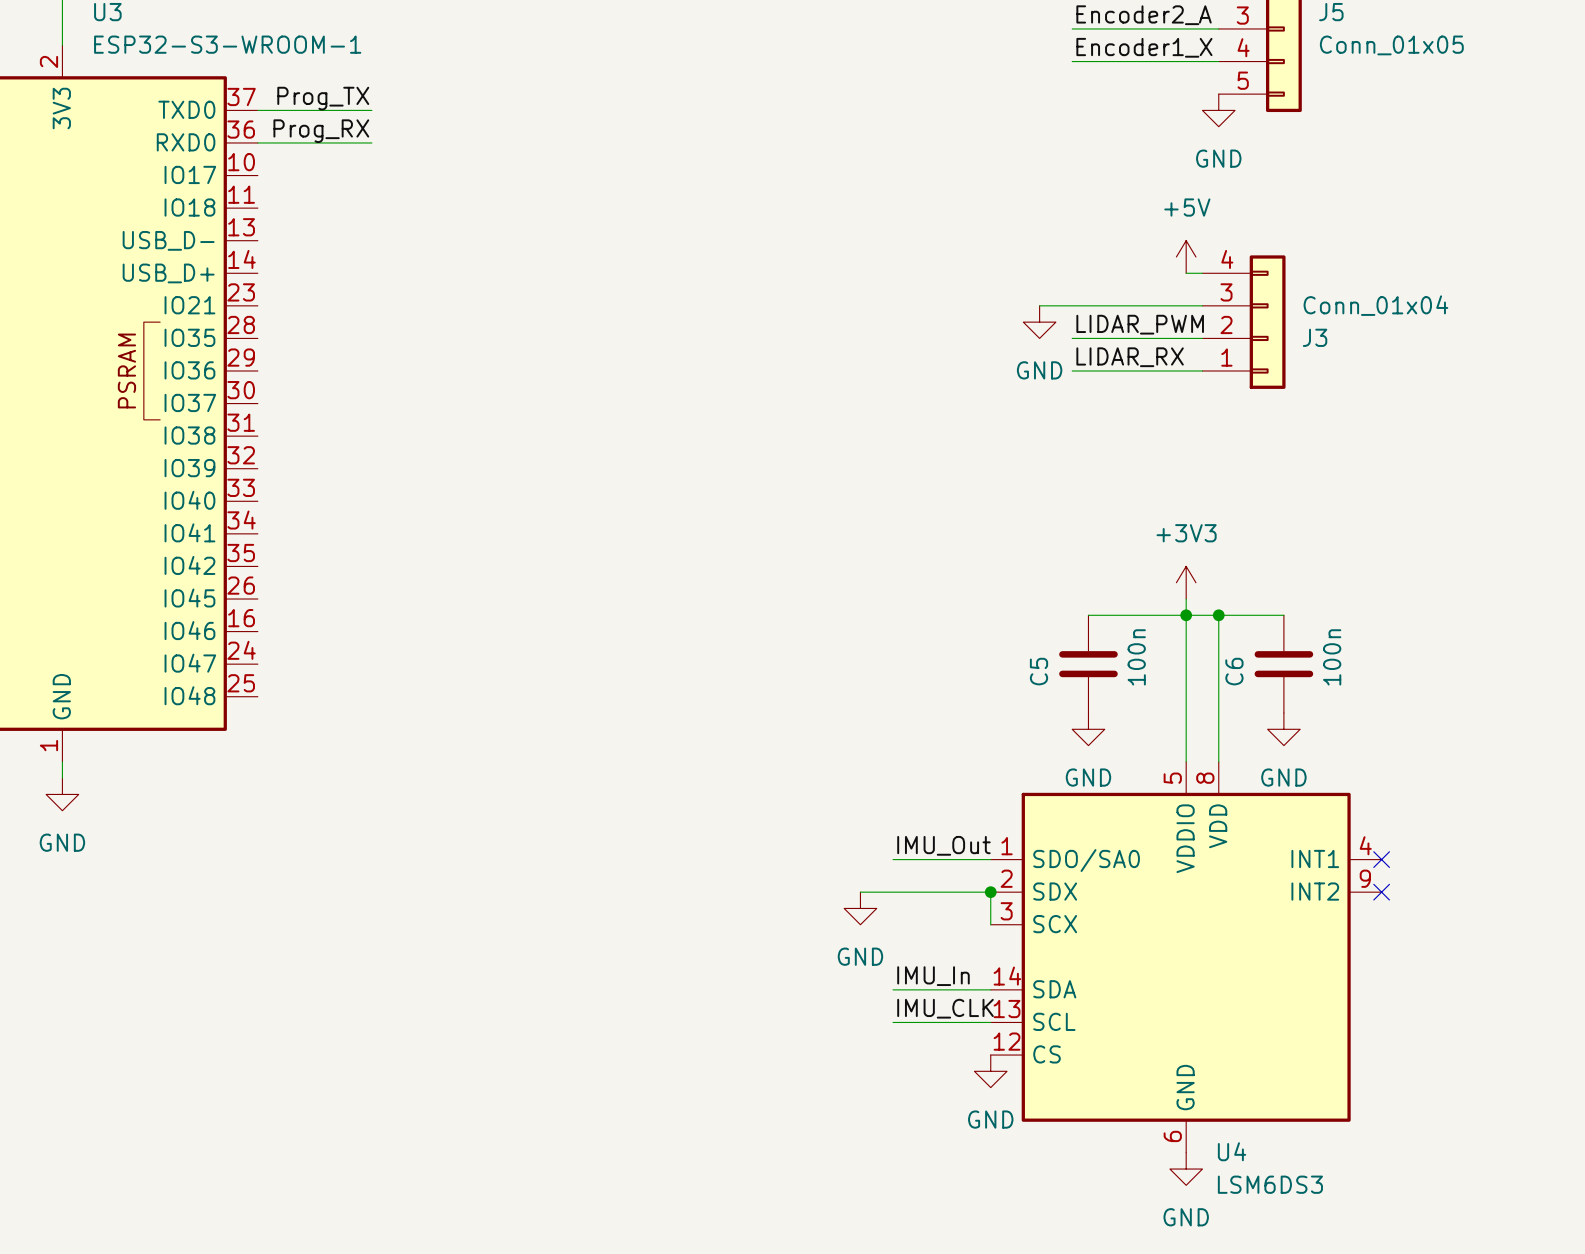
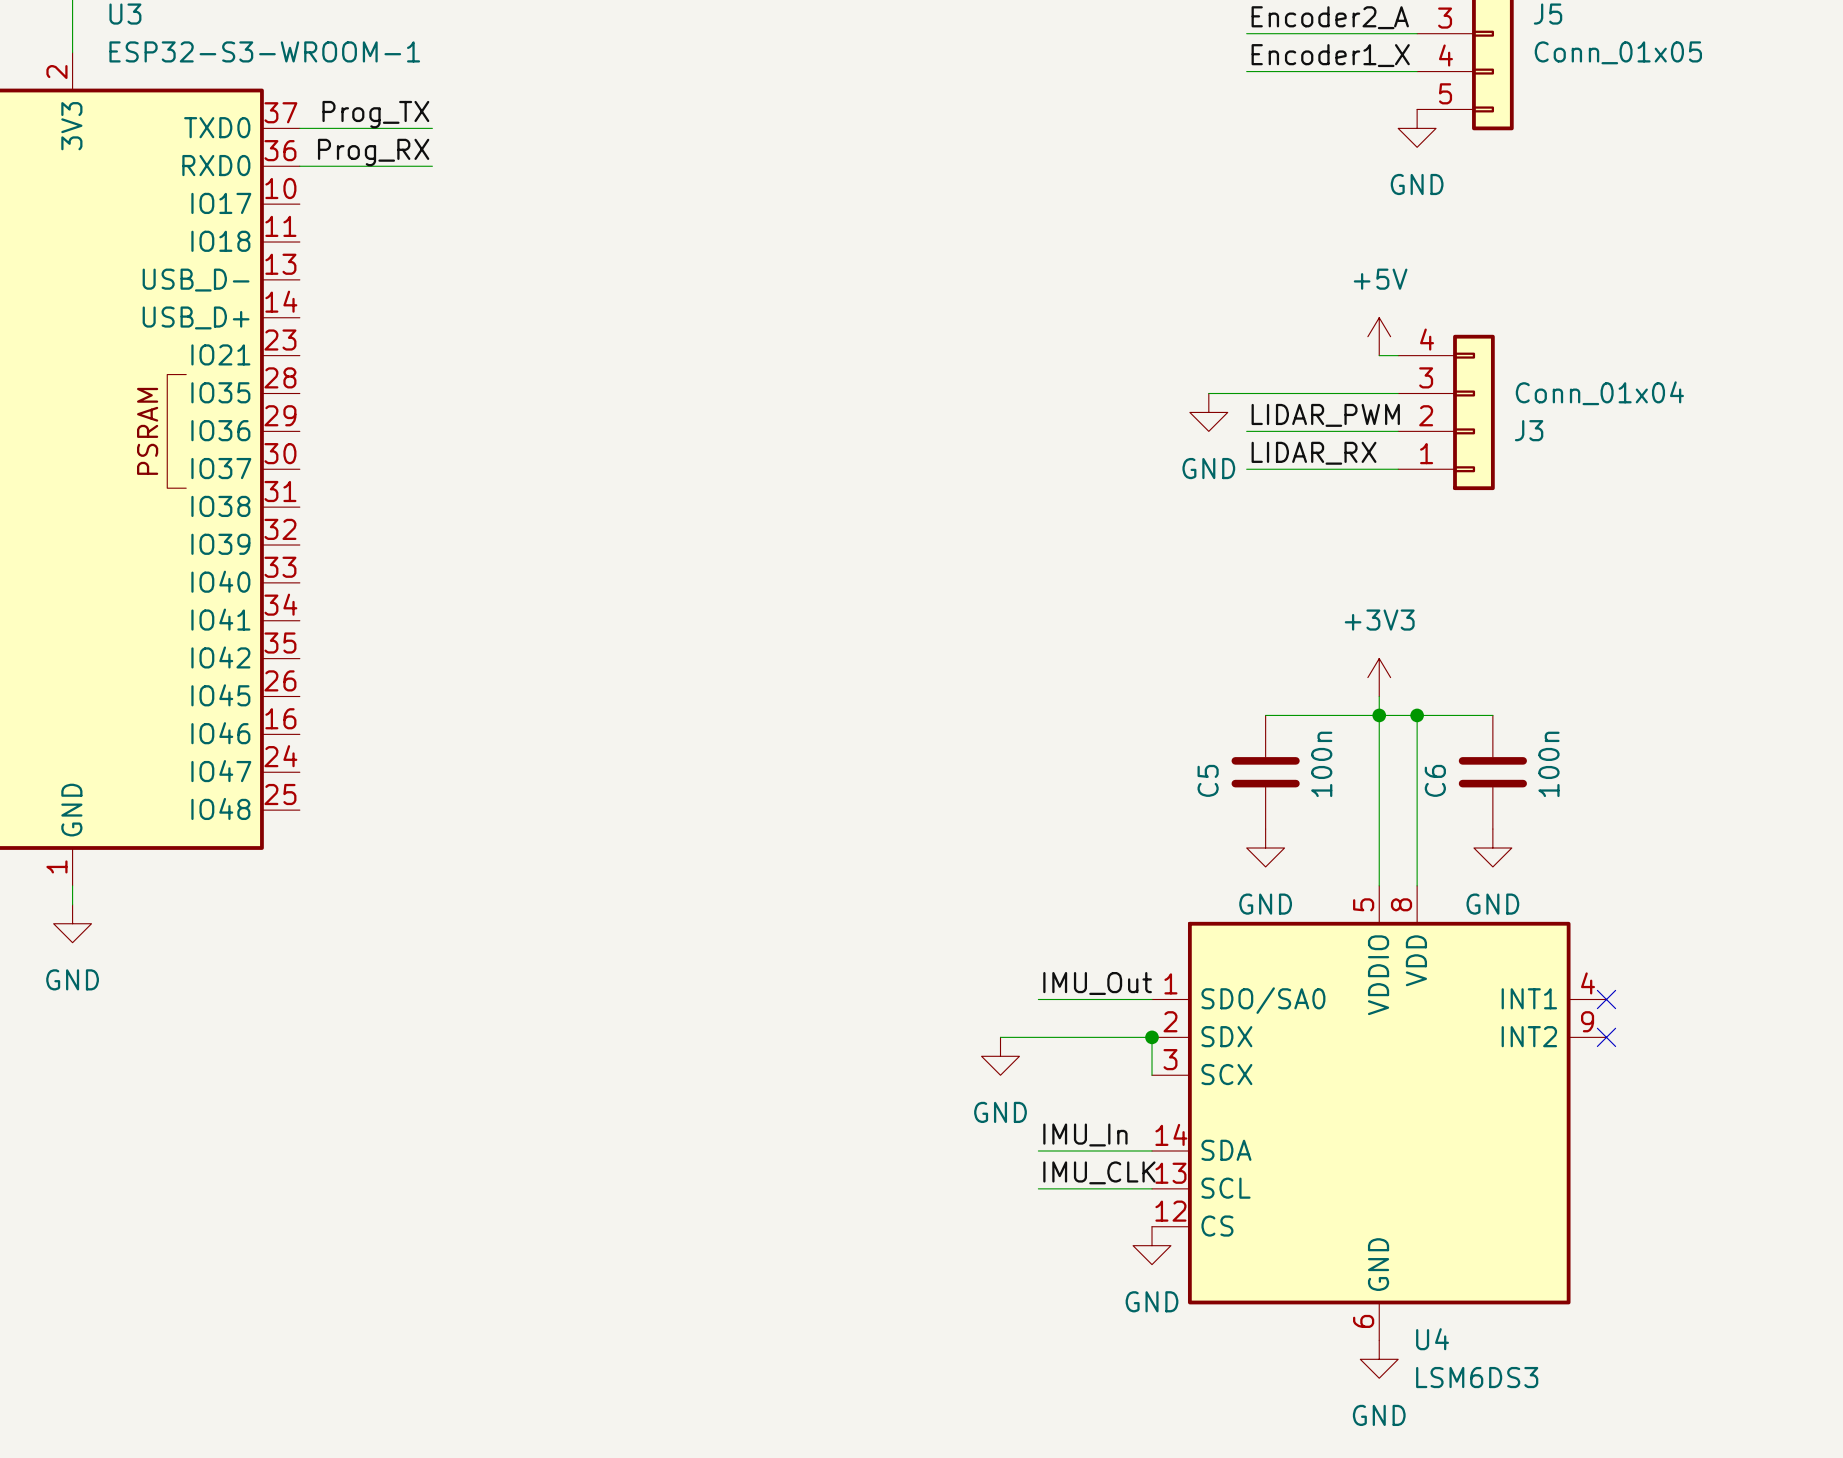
power symbol position: +5V (1186, 256) -> +5V (1379, 336)
wire: (1186, 273) (1202, 273) -> none
wire: (1039, 305) (1186, 305) -> none
power symbol position: GND (1039, 322) -> GND (1208, 412)
J3 position: (1244, 322) -> (1446, 412)
label: LIDAR_PWM (1140, 324) -> none
wire: none -> (1208, 393) (1246, 393)
label: LIDAR_RX (1130, 357) -> LIDAR_PWM (1325, 415)
label: none -> LIDAR_RX (1314, 453)
wire: none -> (1246, 469) (1398, 469)

